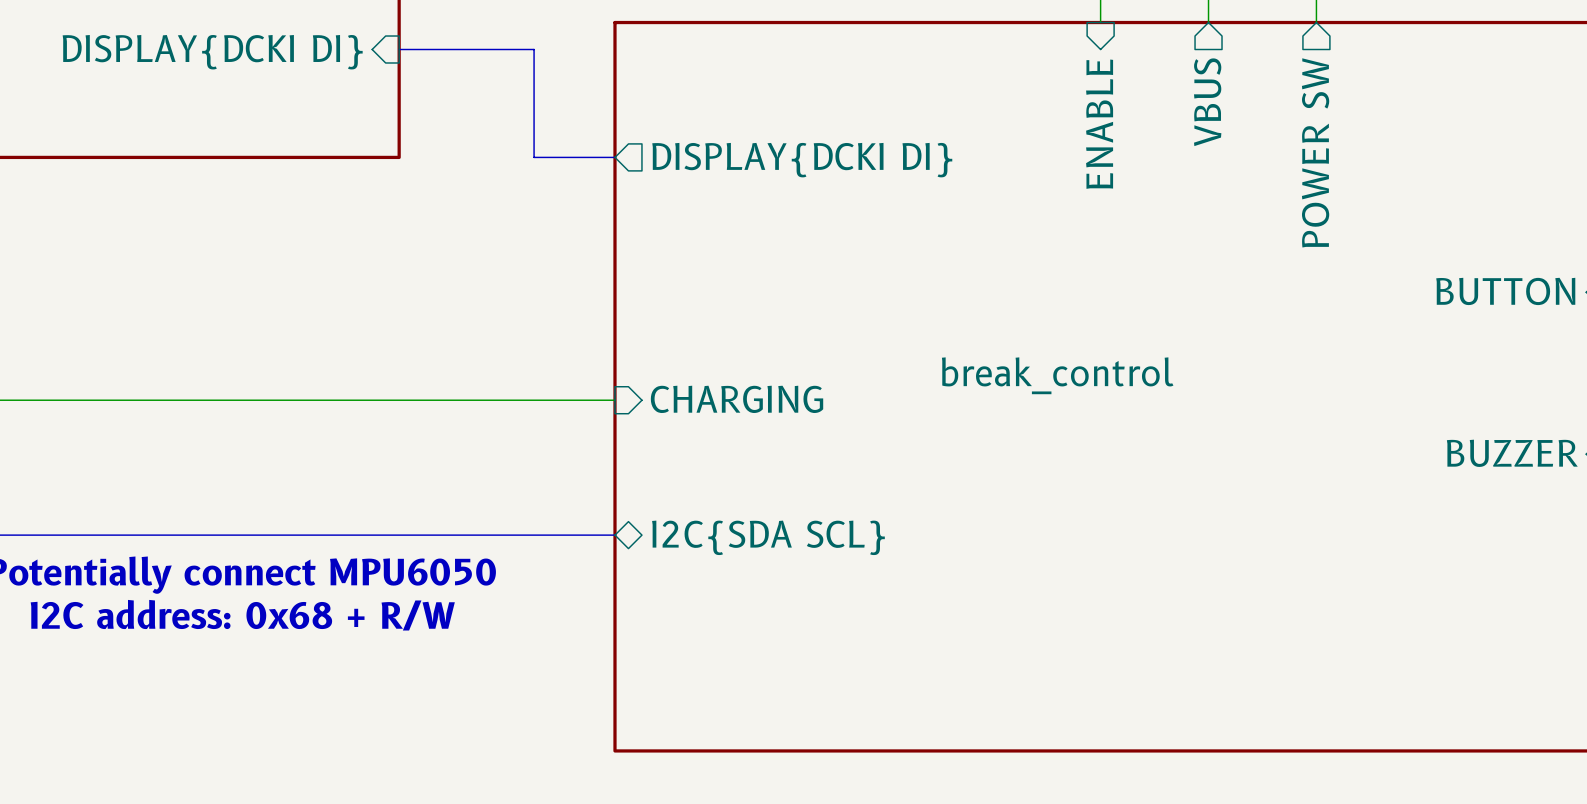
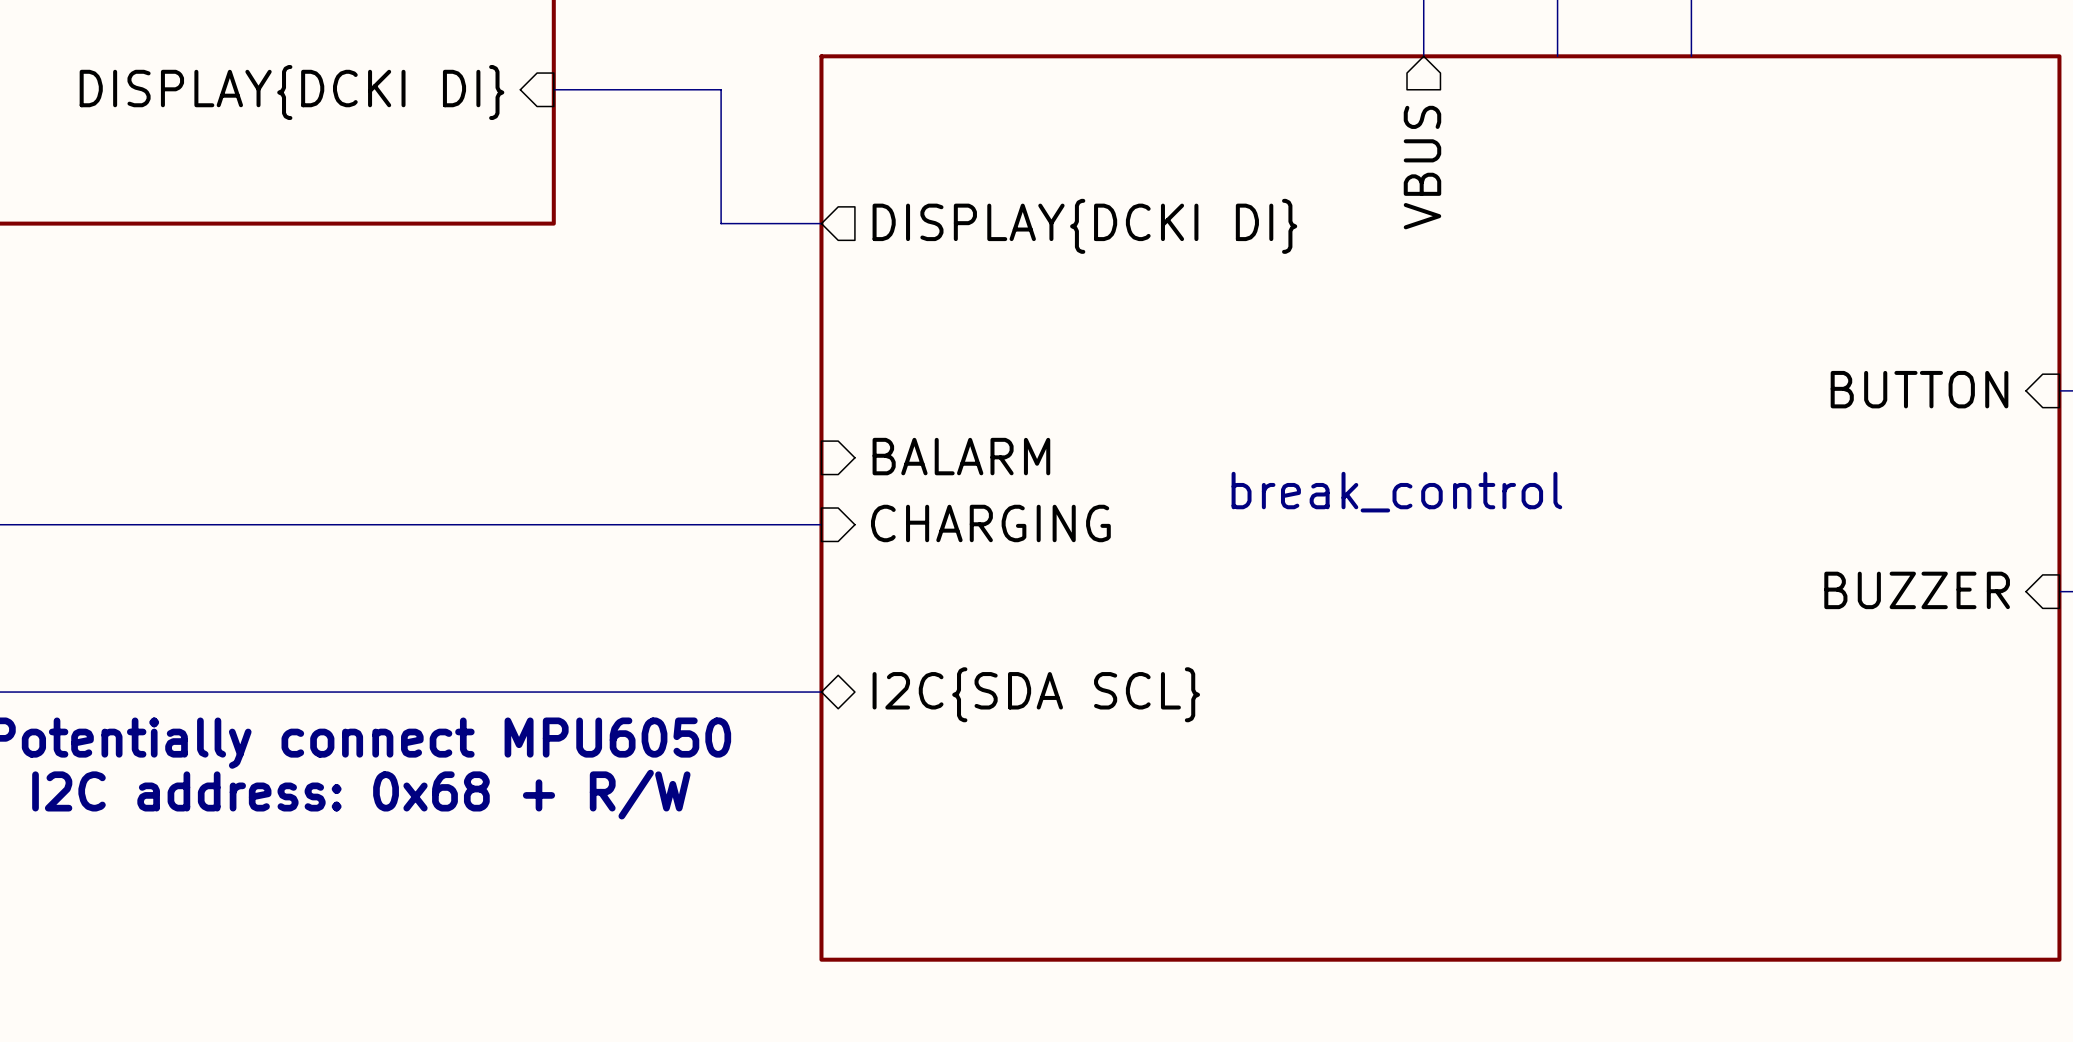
sheet pin: VBUS (1207, 102) -> none
sheet pin shape: input (1099, 124) -> output (1422, 167)
sheet pin: ENABLE (1099, 124) -> VBUS (1422, 167)
sheet pin: POWER SW (1315, 152) -> none
sheet pin: none -> BALARM (961, 456)

